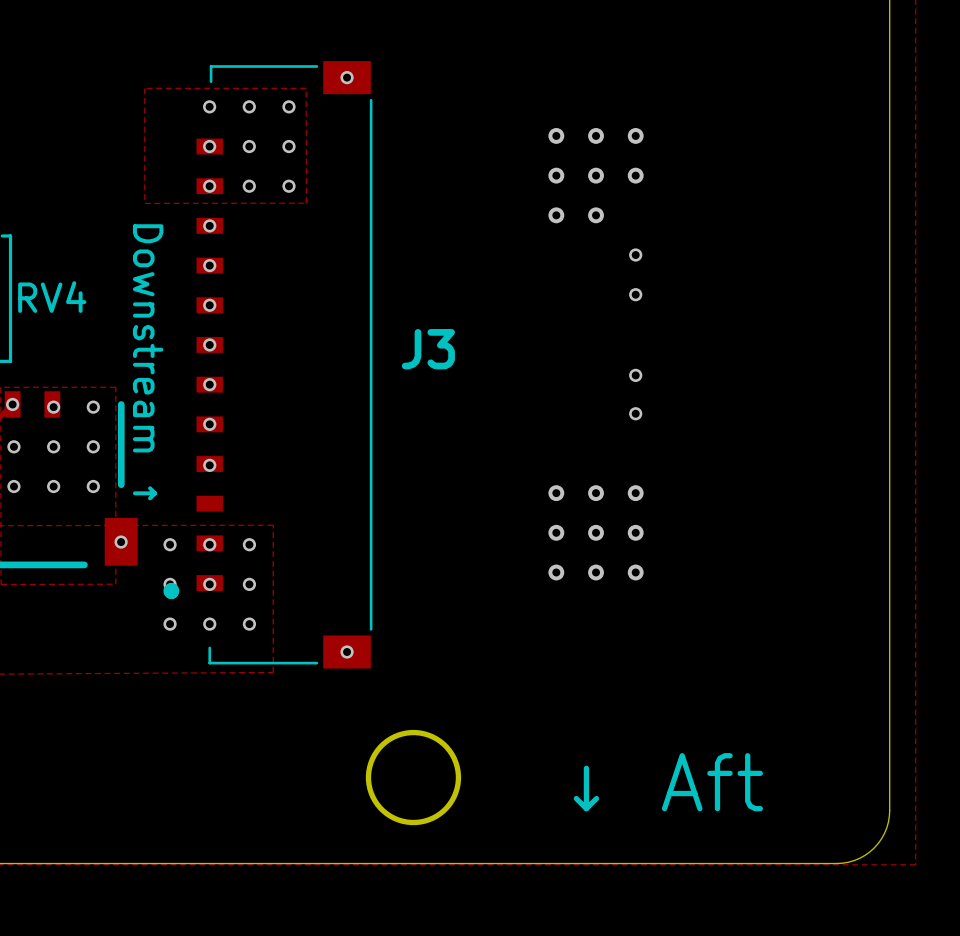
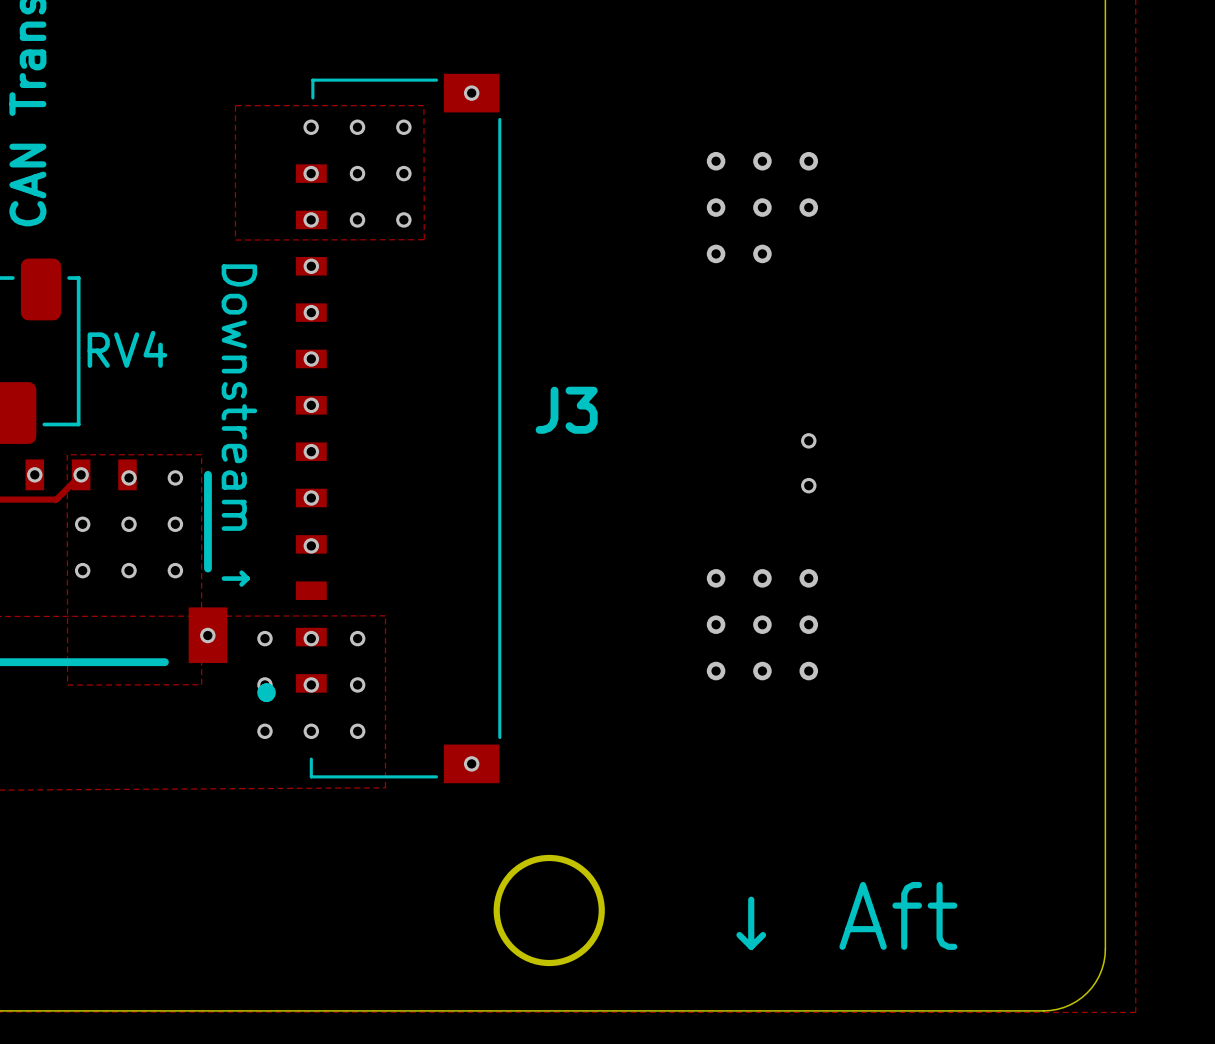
via: (635, 255) -> none
via: (635, 294) -> none

